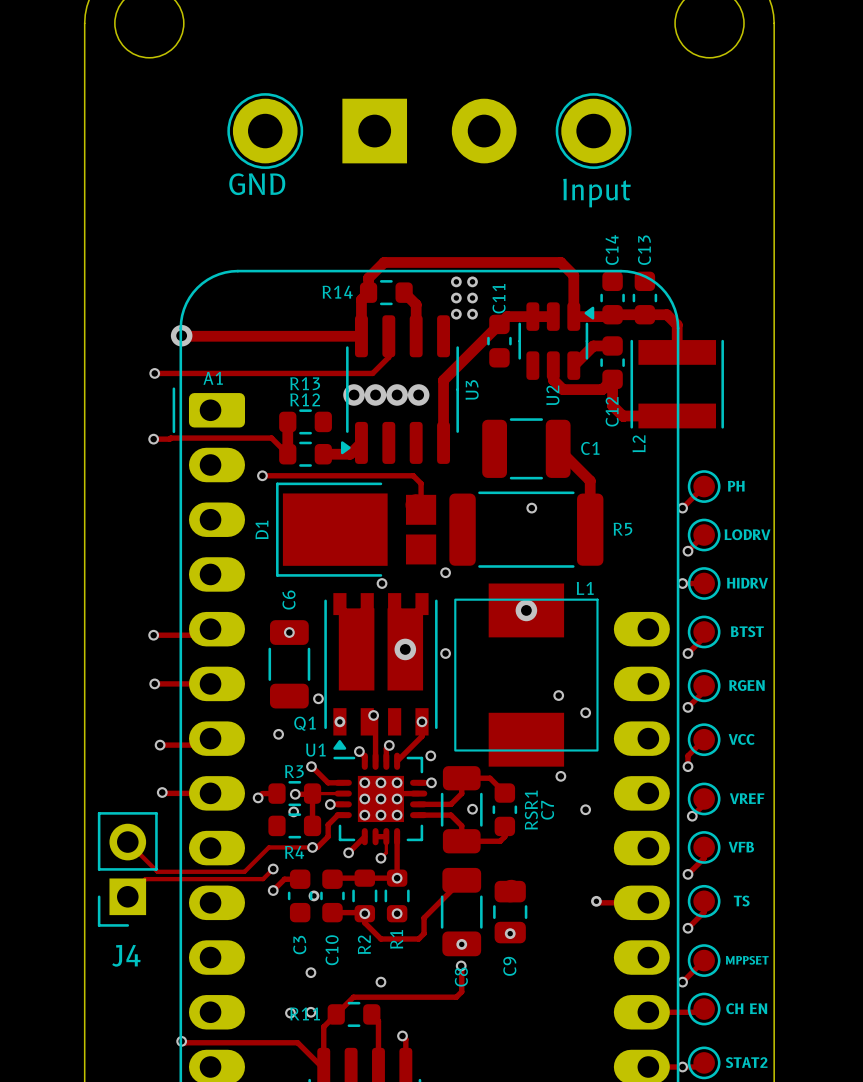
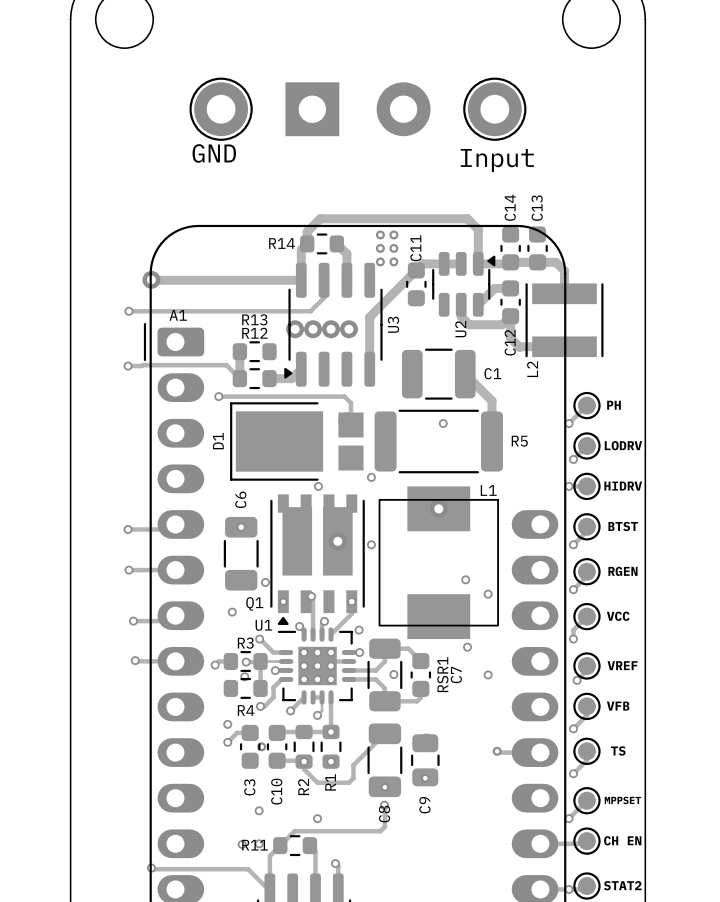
track: (127, 842) (157, 871) (244, 871) (268, 847) (312, 847) -> none
track: (273, 868) (263, 879) (145, 879) (127, 896) -> none
J4: (127, 869) -> none

